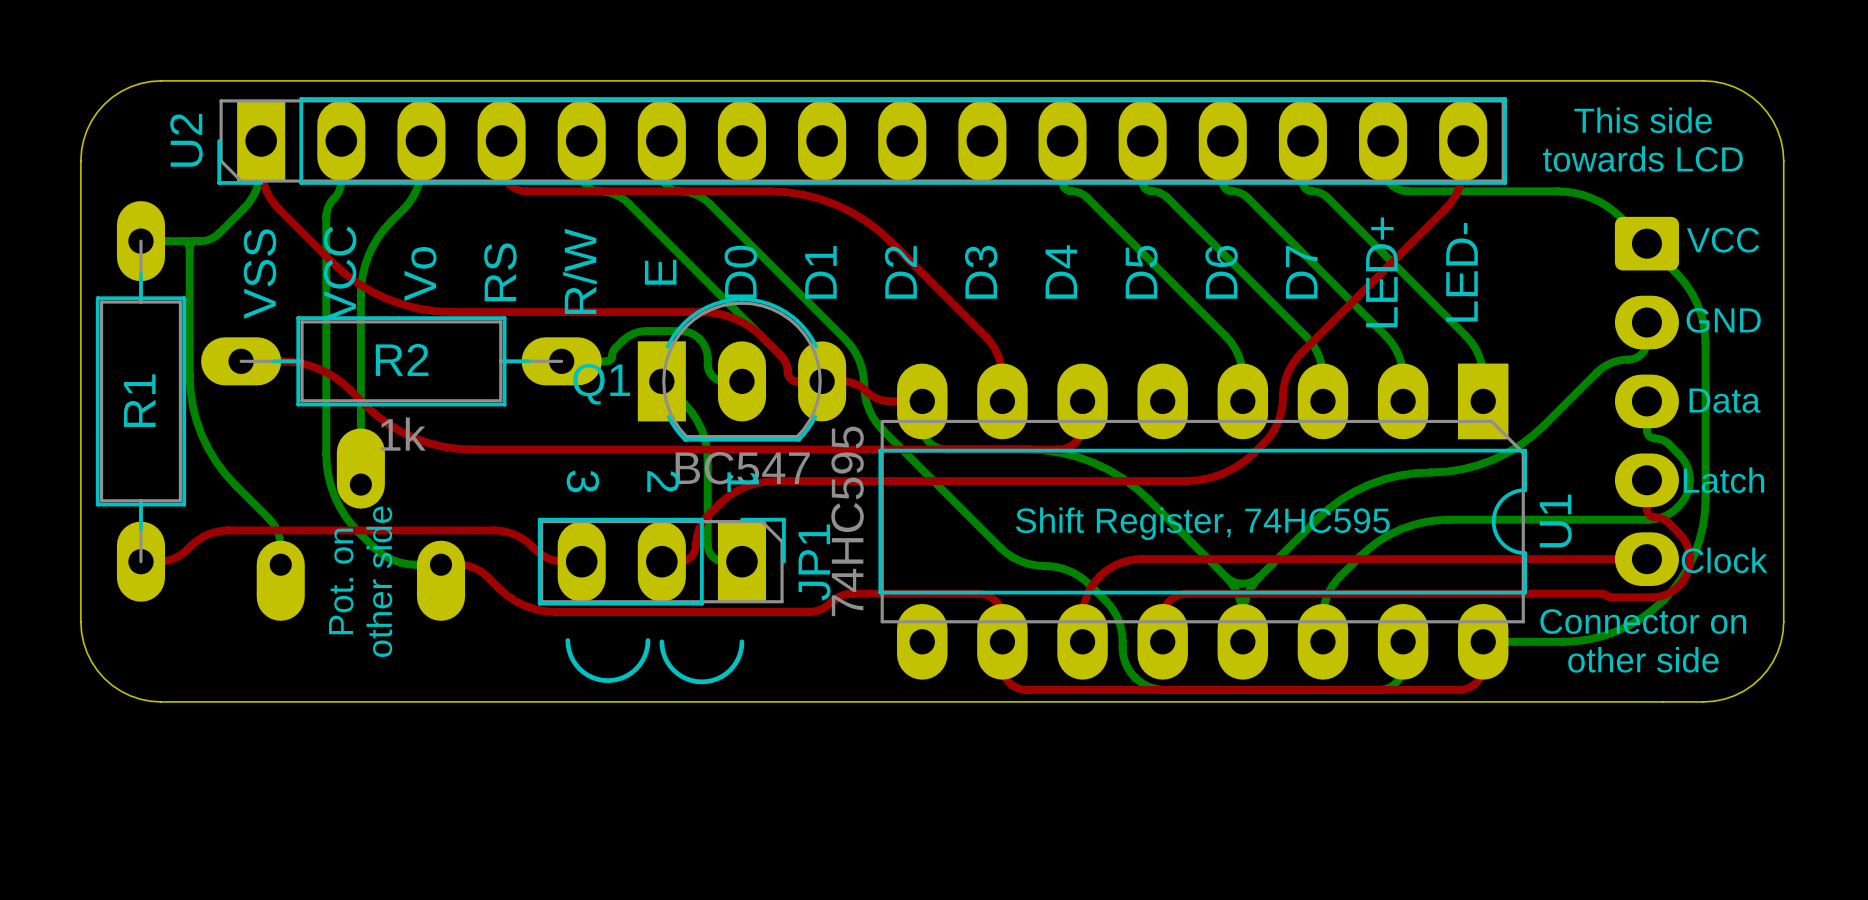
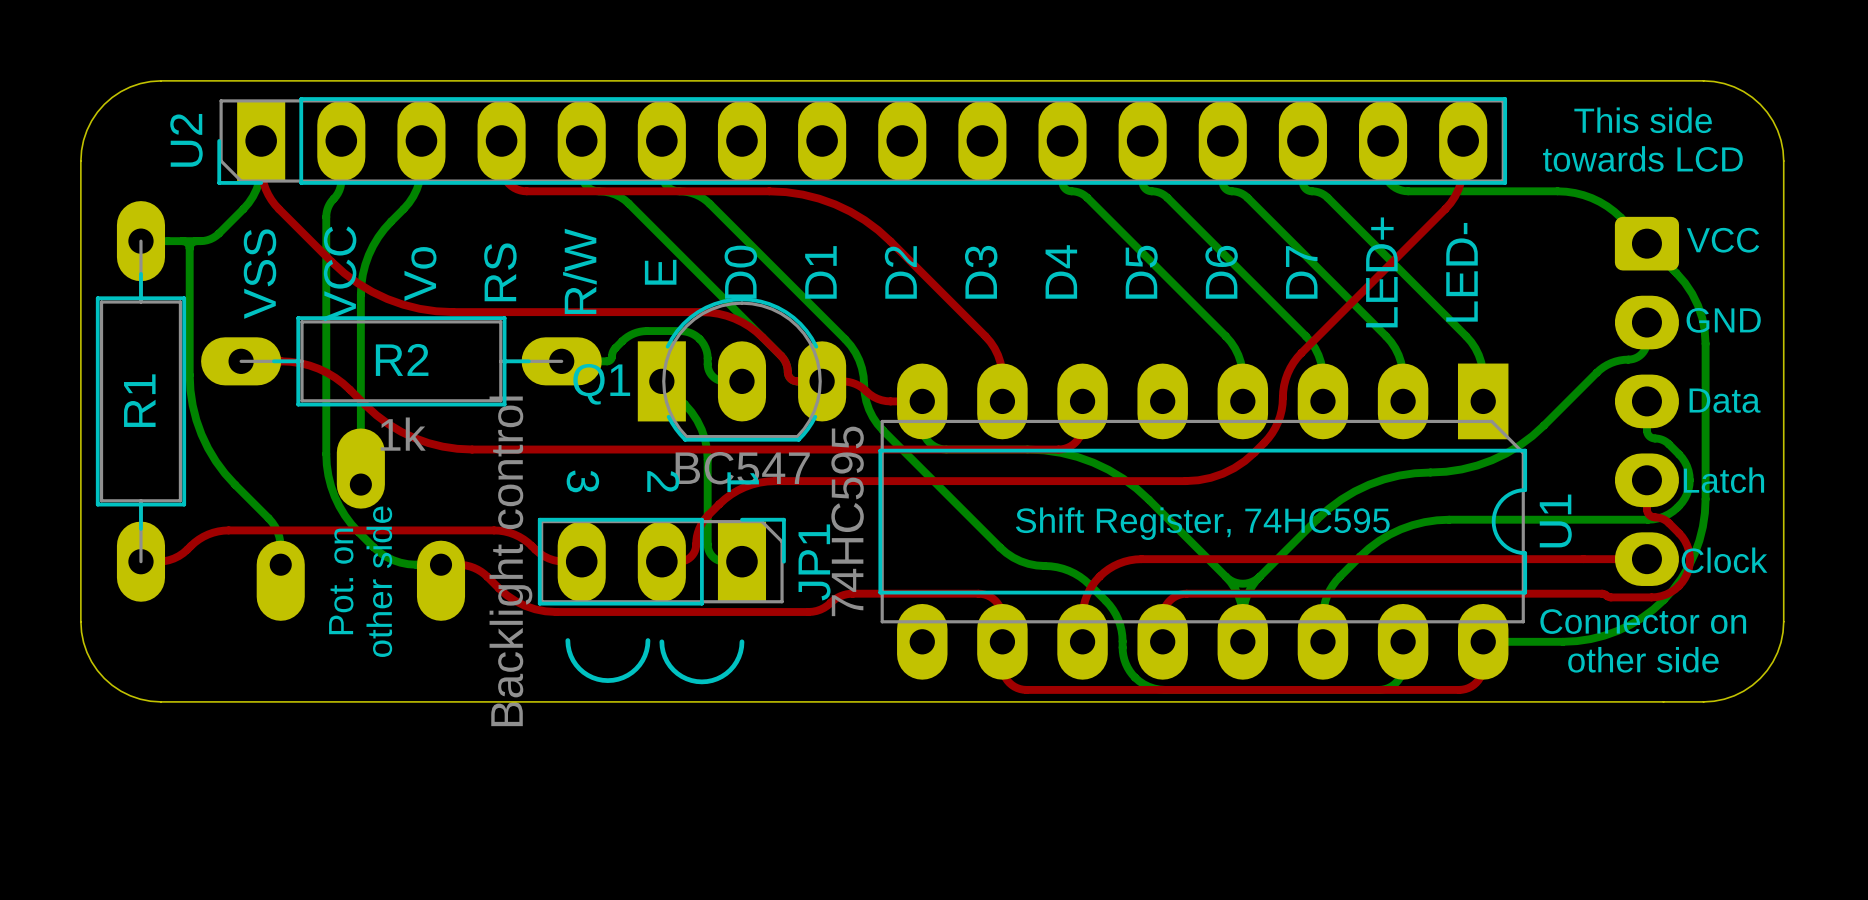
JP1 value: none -> Backlight control (510, 561)

